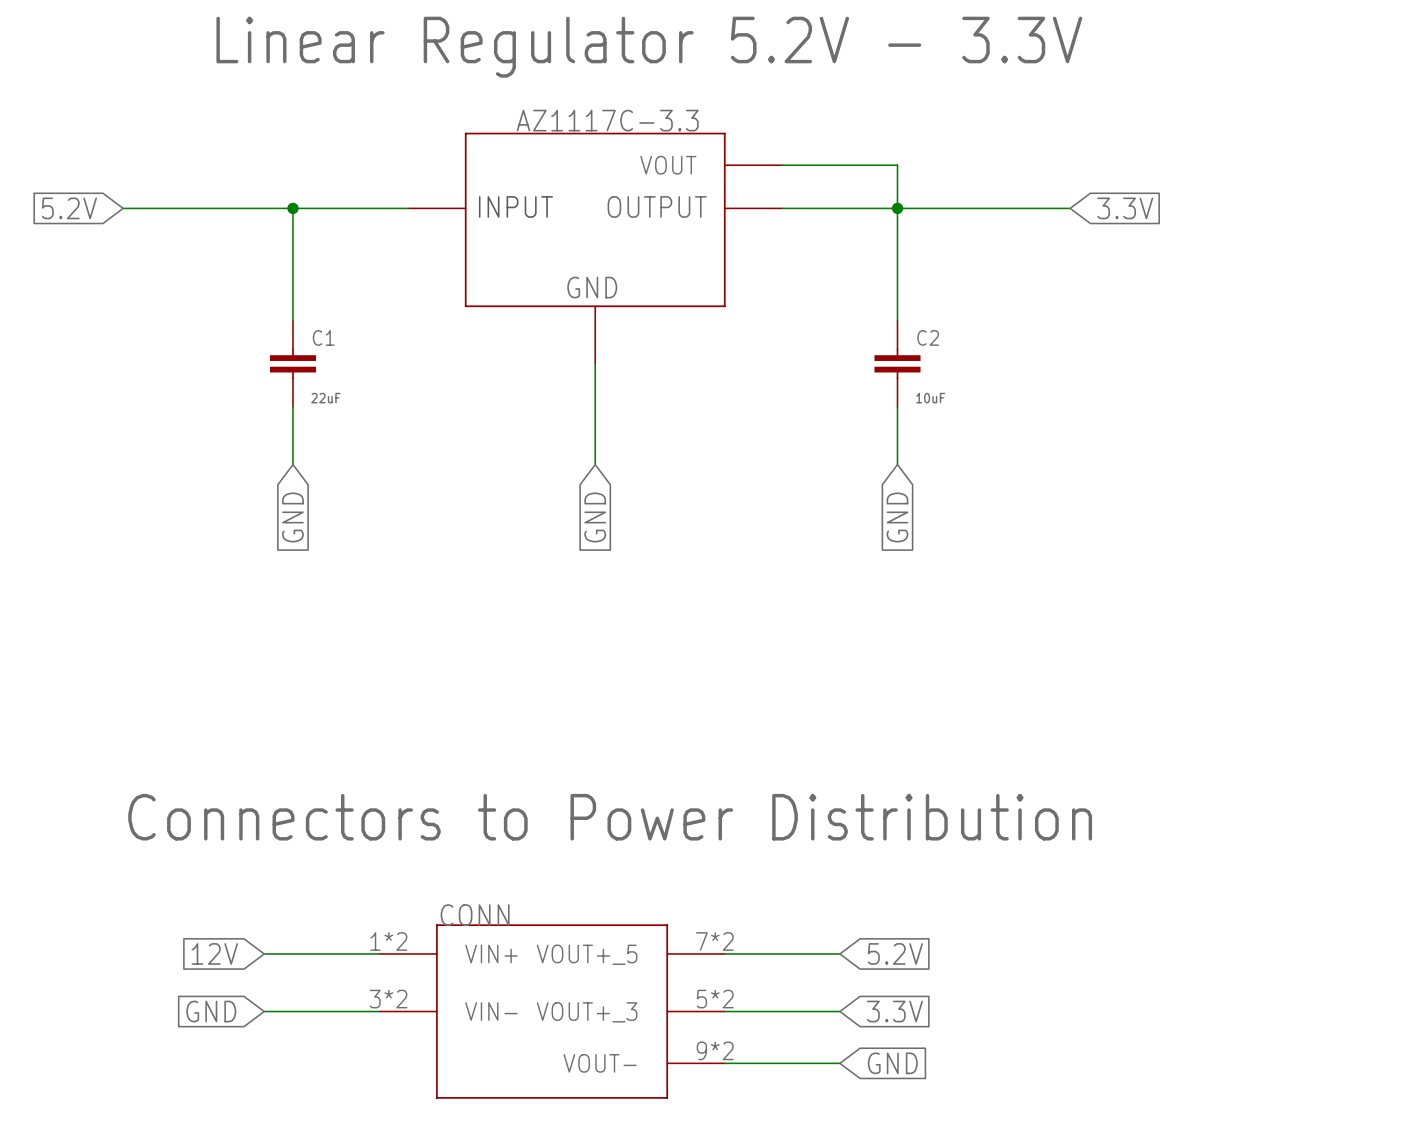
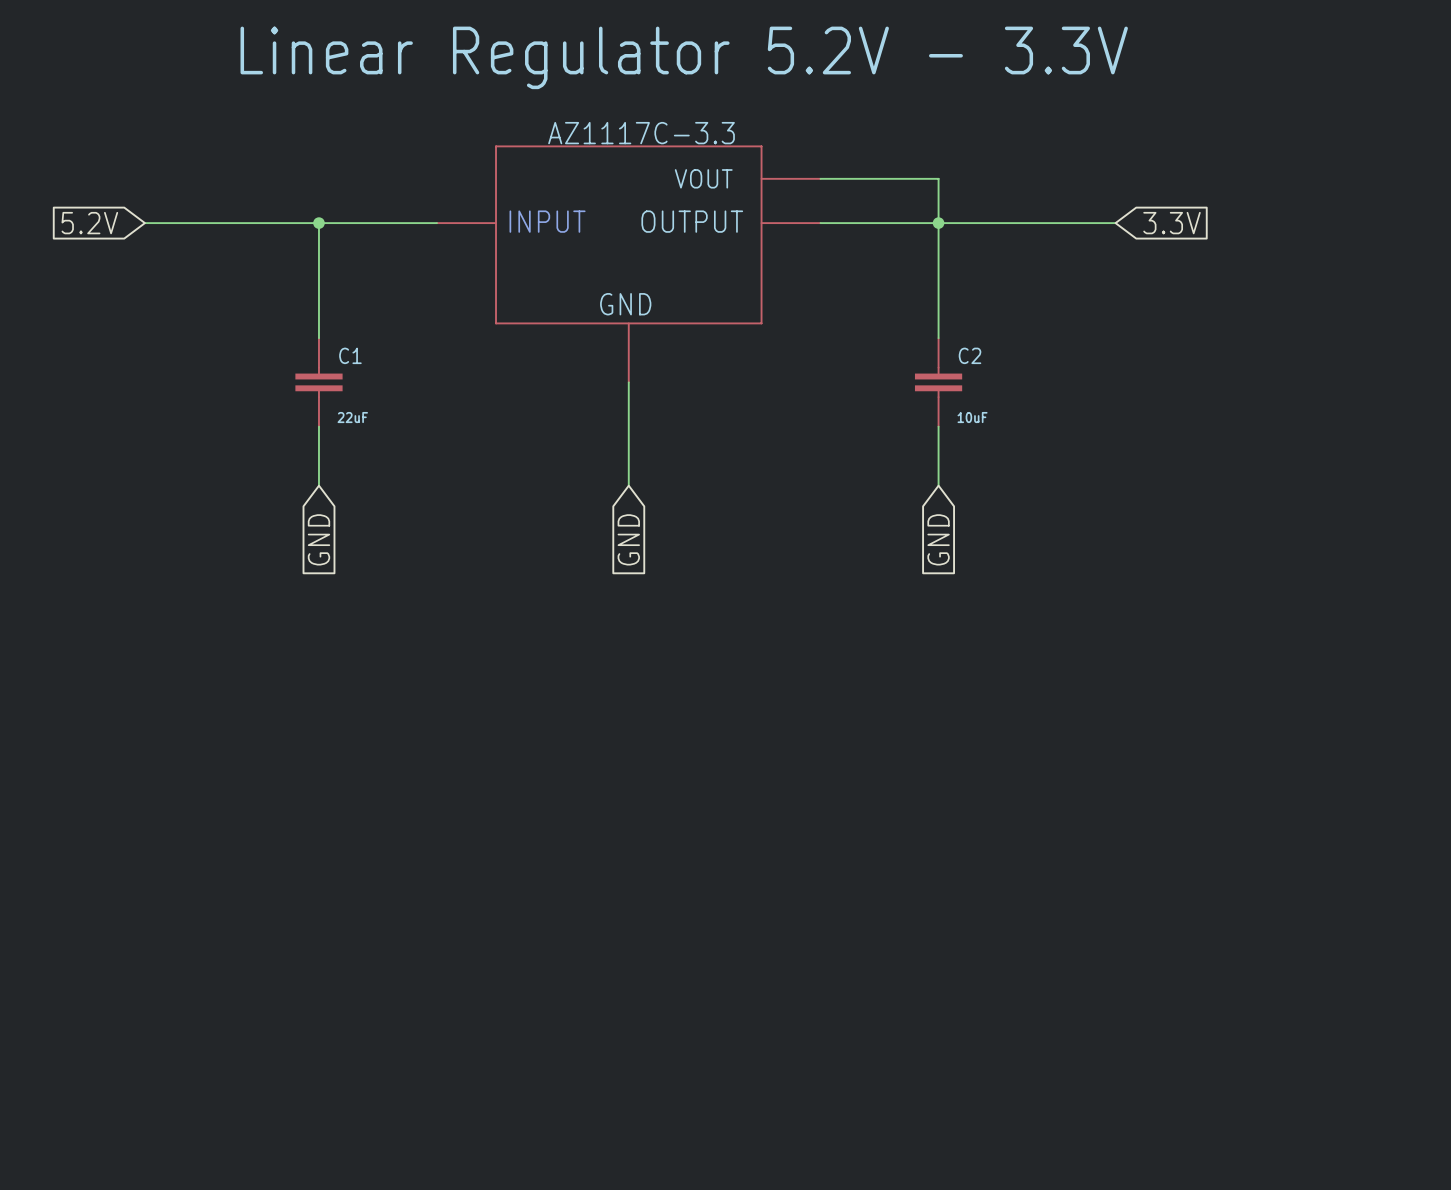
text: Connectors to Power Distribution (610, 817) -> none
global label: 12V (214, 953) -> none
wire: (264, 953) (379, 953) -> none
wire: (724, 953) (839, 953) -> none
global label: 5.2V (895, 953) -> none
global label: GND (211, 1011) -> none
wire: (264, 1011) (379, 1011) -> none
CONN: (552, 1011) -> none
wire: (724, 1011) (839, 1011) -> none
global label: 3.3V (894, 1011) -> none
wire: (724, 1063) (839, 1063) -> none
global label: GND (892, 1063) -> none

